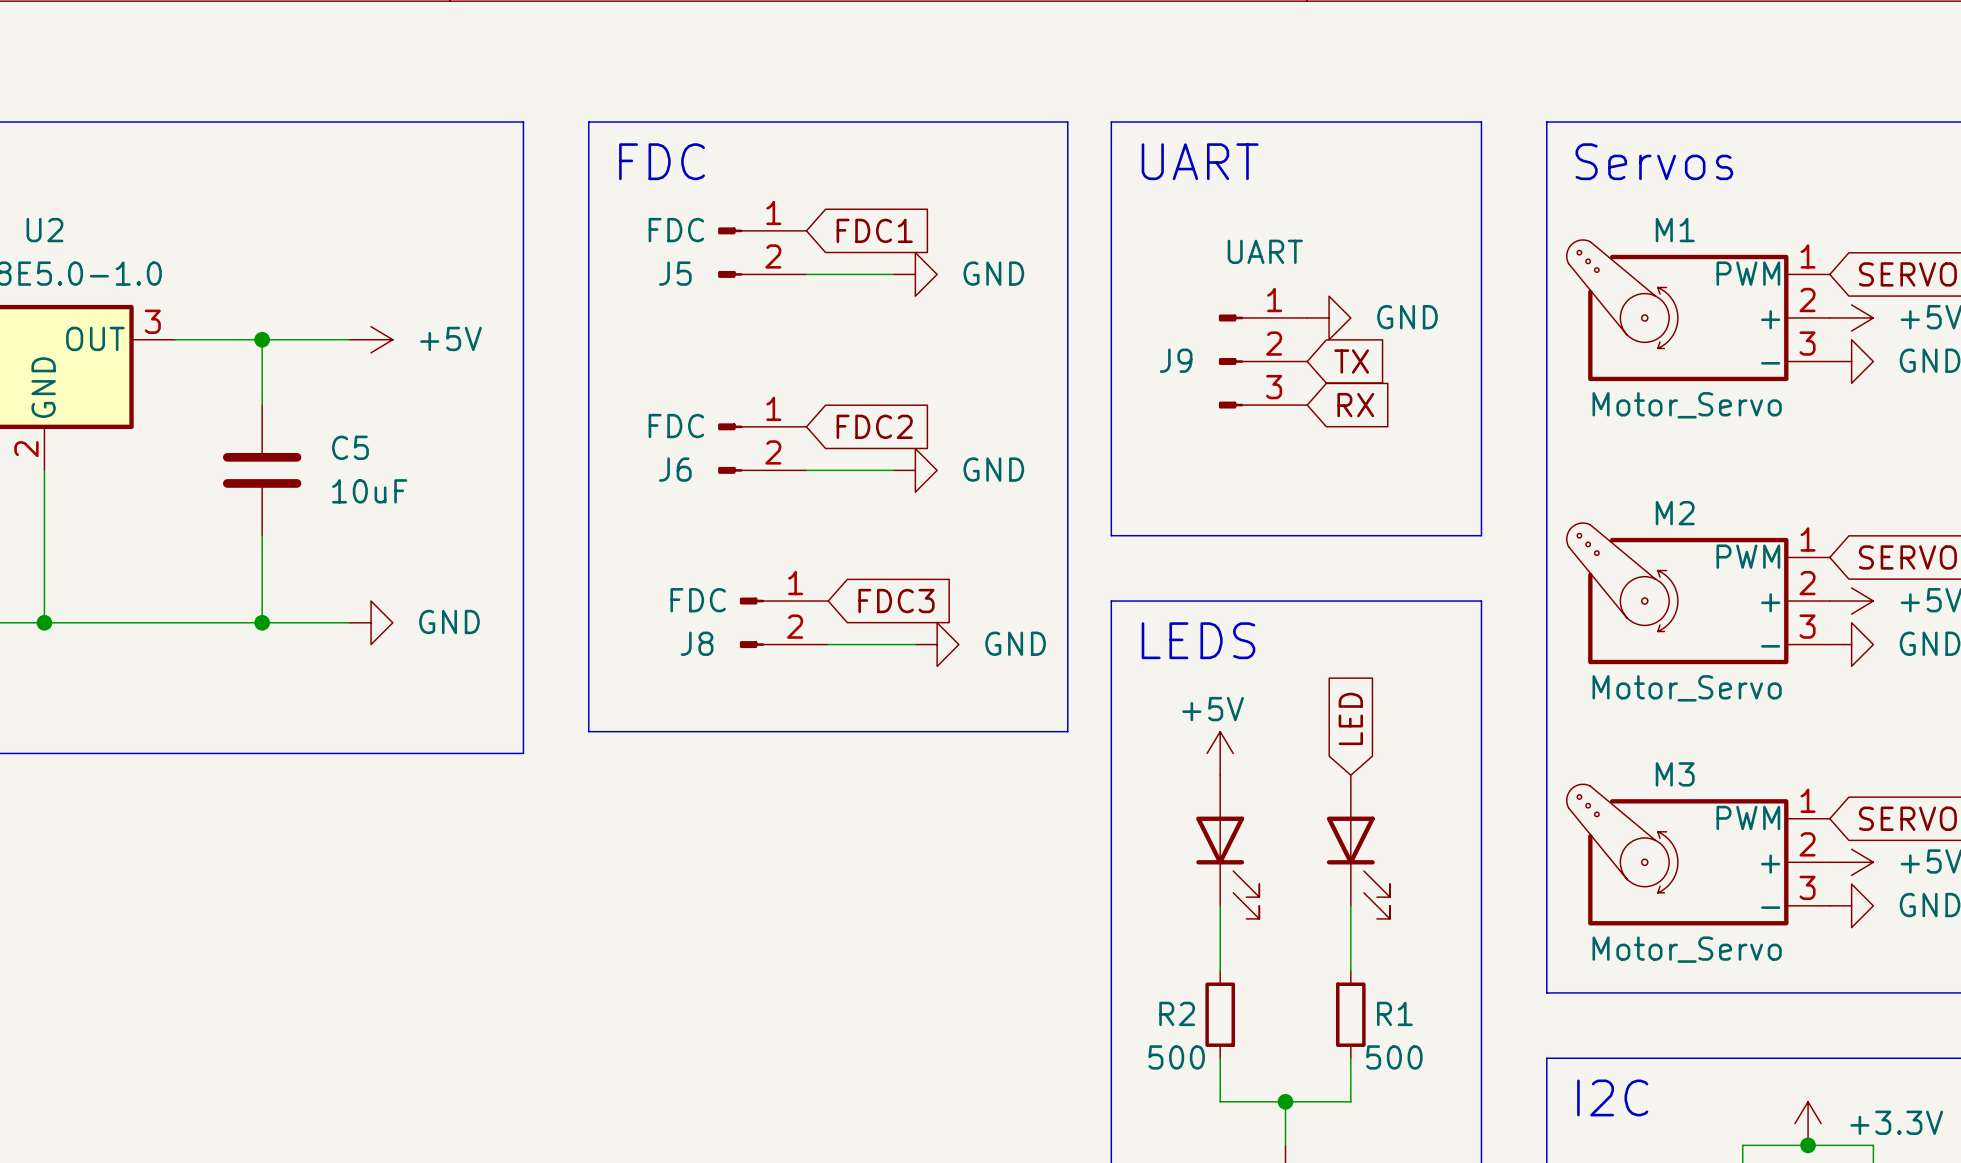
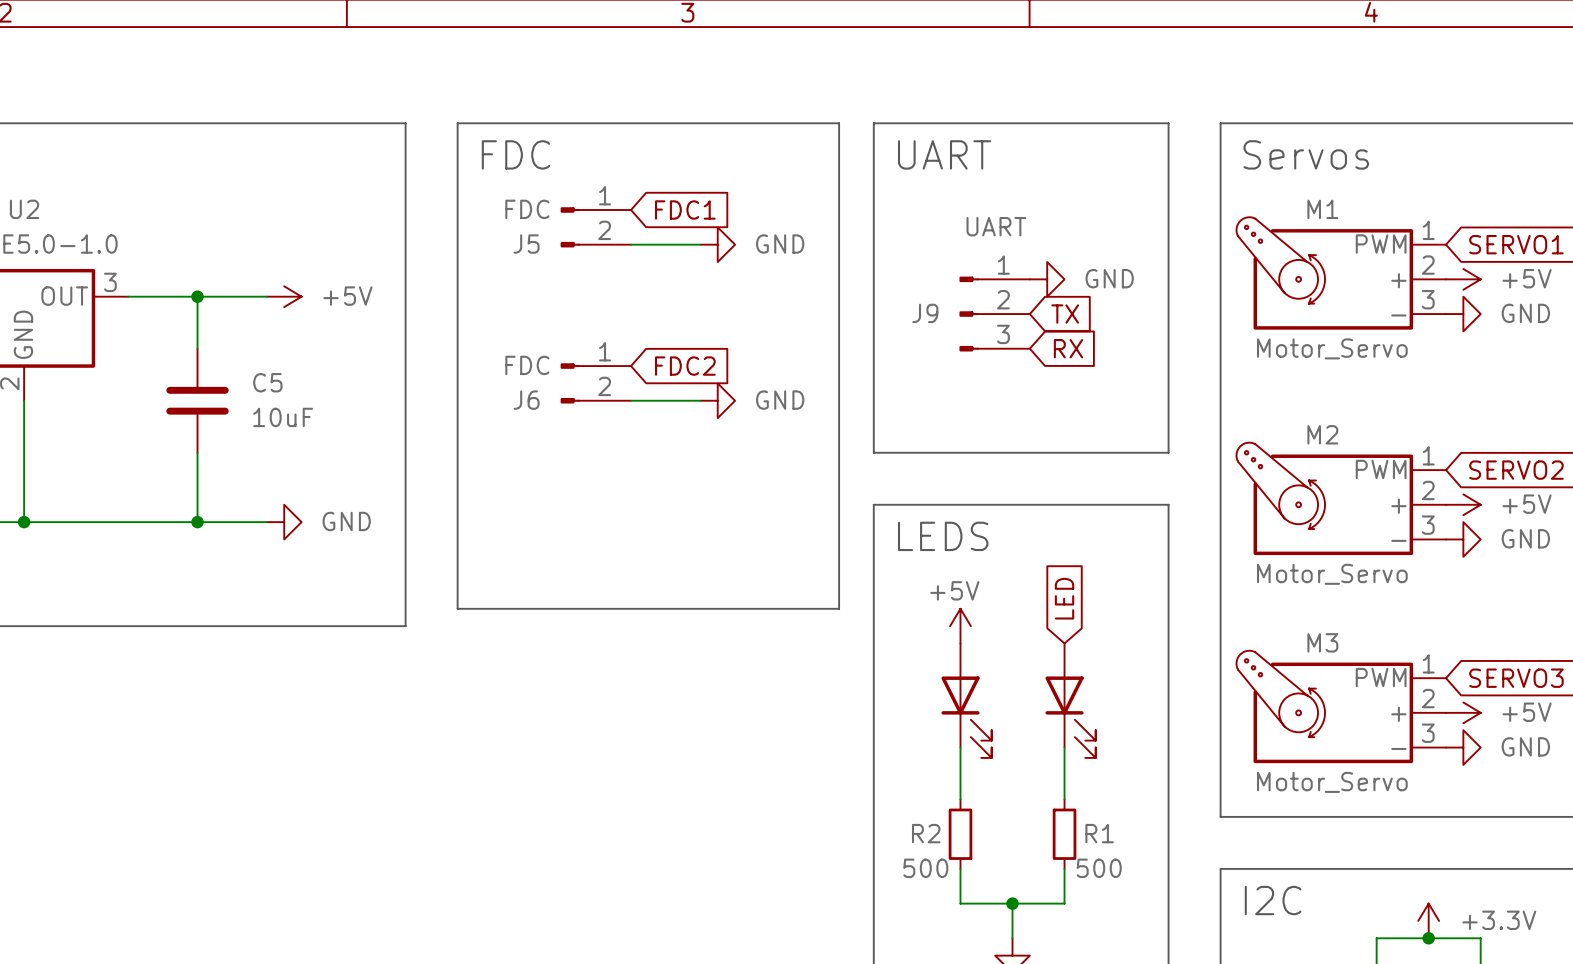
global label: FDC3 (896, 601) -> none
J8: FDC (784, 622) -> none
wire: (828, 644) (915, 644) -> none
power symbol: GND (937, 644) -> none

